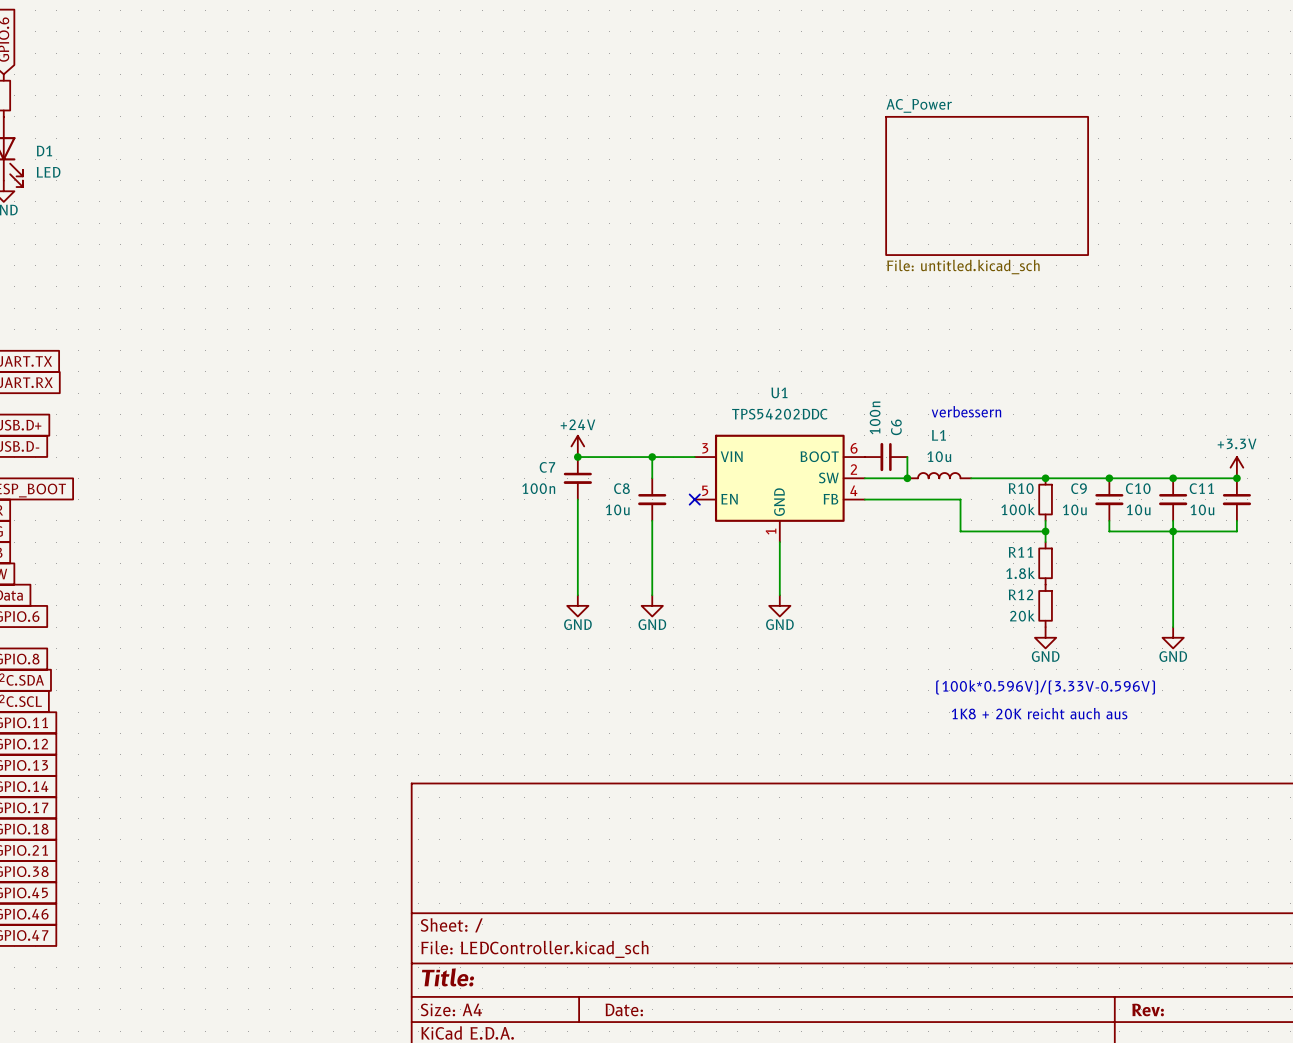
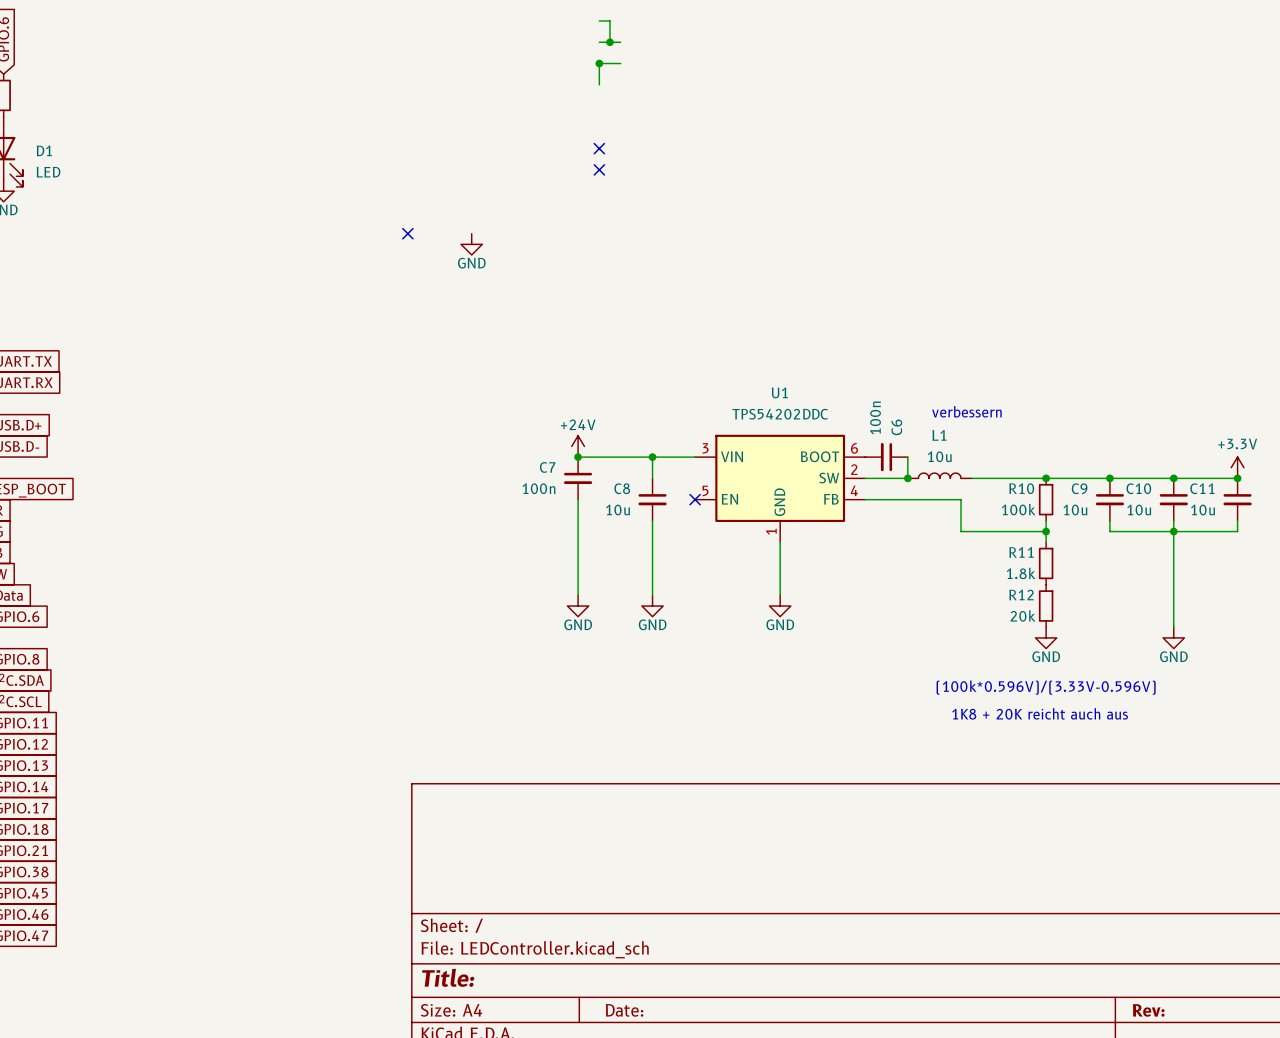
wire: none -> (599, 20) (609, 20) (609, 42)
wire: none -> (599, 42) (620, 42)
junction: none -> (609, 42)
junction: none -> (599, 63)
wire: none -> (620, 63) (599, 63) (599, 84)
no-connect mark: none -> (599, 148)
no-connect mark: none -> (599, 169)
sheet AC_Power: File: untitled.kicad_sch (987, 185) -> none
no-connect mark: none -> (407, 233)
power symbol: none -> GND (471, 244)

